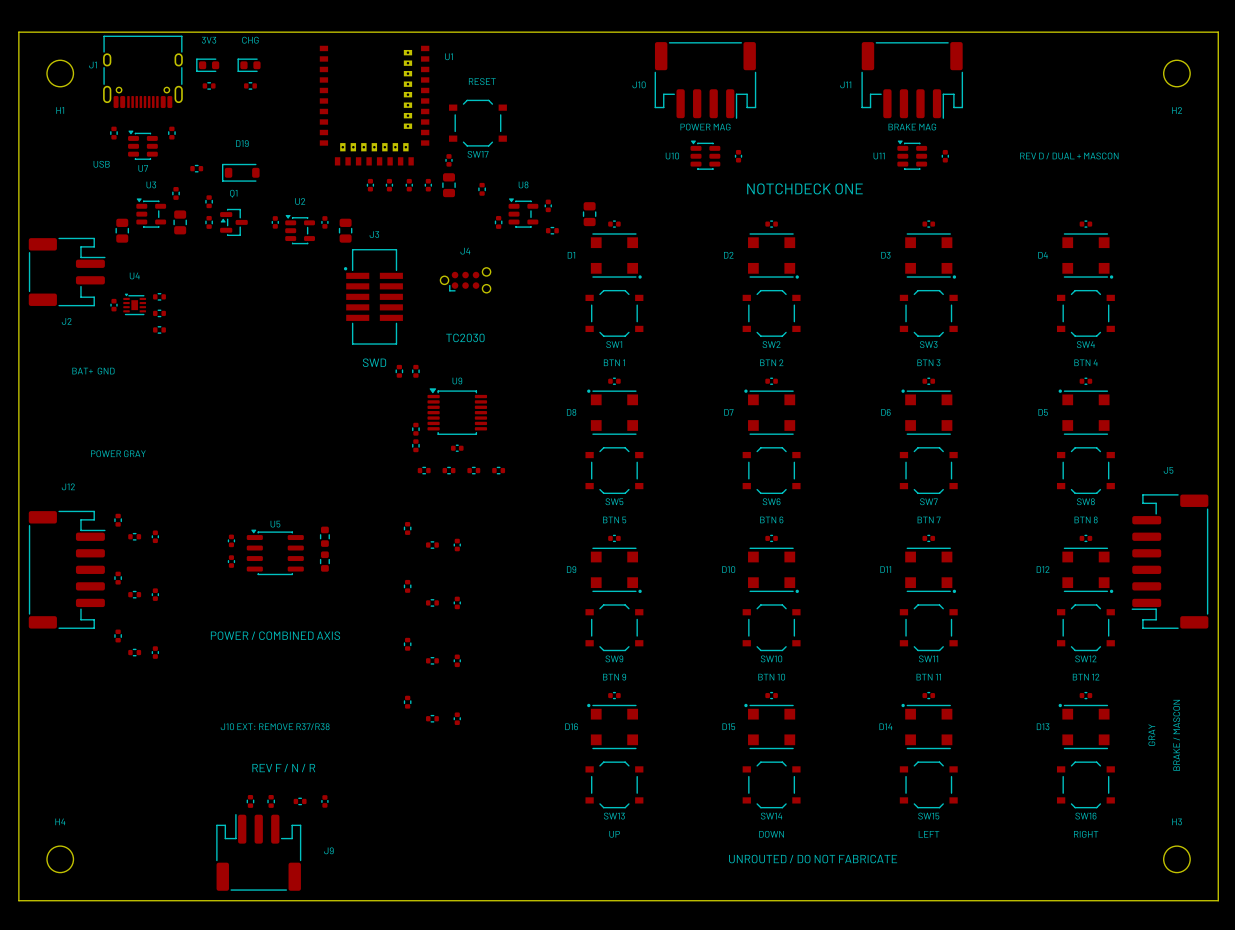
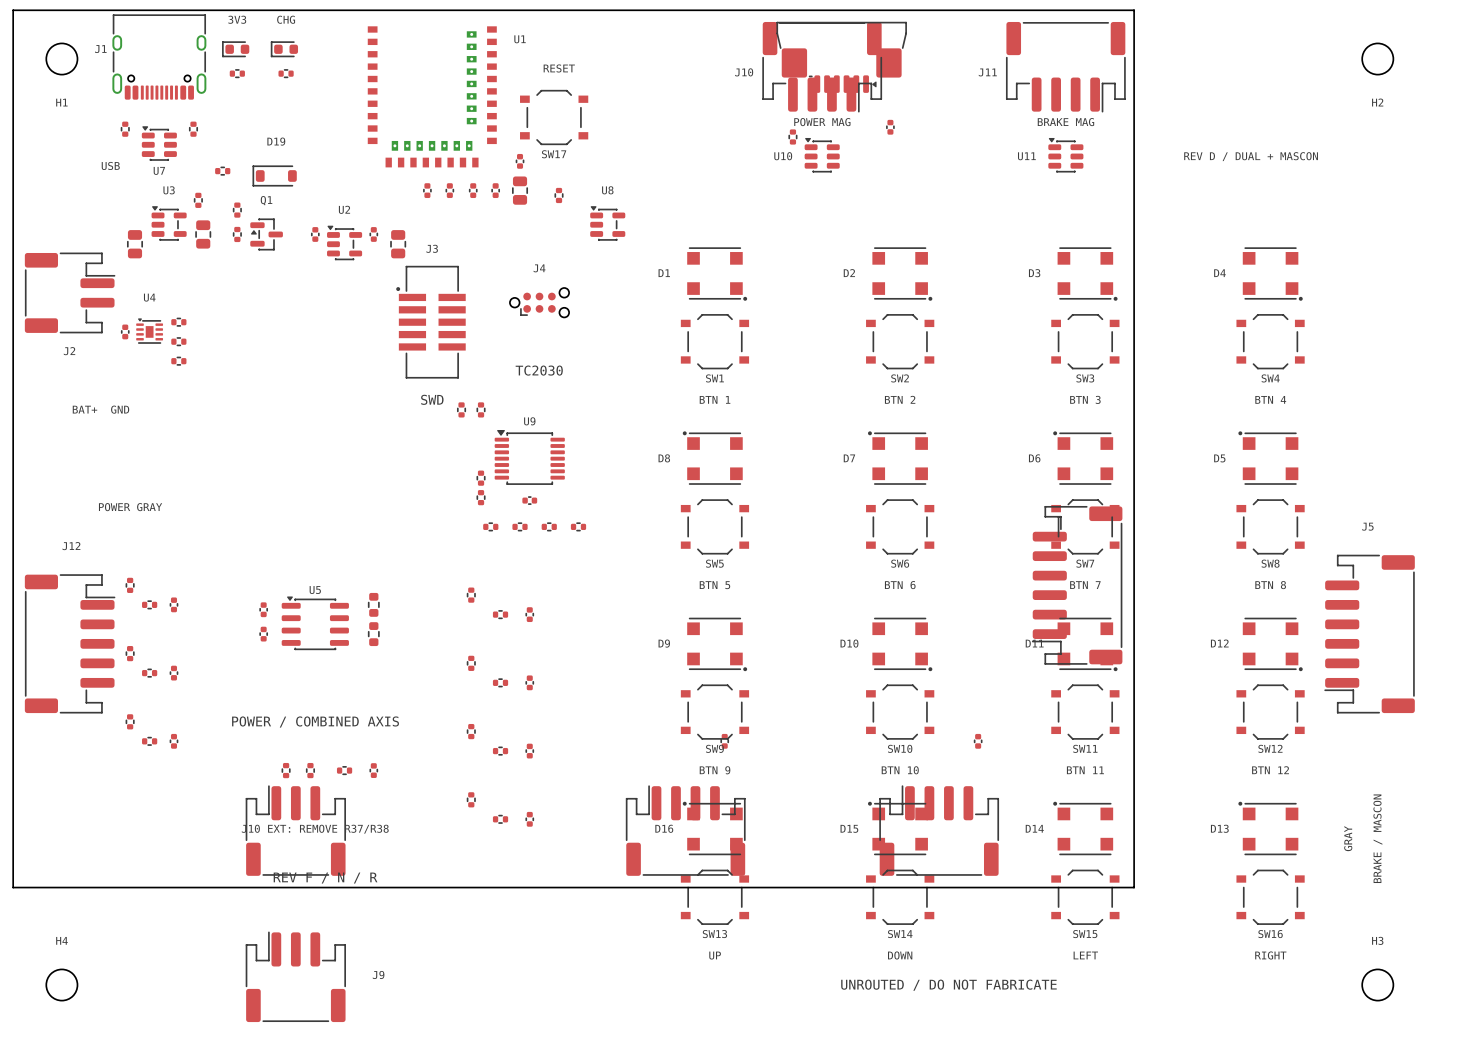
board edge: (970, 32) (1218, 32) (1218, 900) (18, 900) (18, 776) -> (1134, 10) (1134, 887) (13, 887)
part: none -> (841, 57)
part: none -> (792, 137)
part position: (738, 156) -> (890, 127)
part: (945, 156) -> none
text: NOTCHDECK ONE (804, 188) -> none
part: (548, 205) -> none
part: (589, 214) -> none
part: (498, 222) -> none
part: (614, 224) -> none
part: (771, 224) -> none
part: (928, 224) -> none
part: (1085, 224) -> none
part: (552, 230) -> none
part: (614, 381) -> none
part: (771, 381) -> none
part: (928, 381) -> none
part: (1085, 381) -> none
part: none -> (1077, 585)
part: (614, 538) -> none
part: (771, 538) -> none
part: (928, 538) -> none
part: (1085, 538) -> none
part: none -> (978, 741)
part: none -> (286, 770)
part: none -> (310, 770)
part: none -> (344, 770)
part rotation: 0° (614, 695) -> 90° clockwise (724, 741)
part position: (614, 695) -> (724, 741)
part: (771, 695) -> none
part: (928, 695) -> none
part: (1085, 695) -> none
part: none -> (295, 830)
part: none -> (685, 830)
part: none -> (939, 830)
part: (250, 801) -> none
part: (271, 801) -> none
part: (300, 801) -> none
part position: (324, 801) -> (373, 770)

